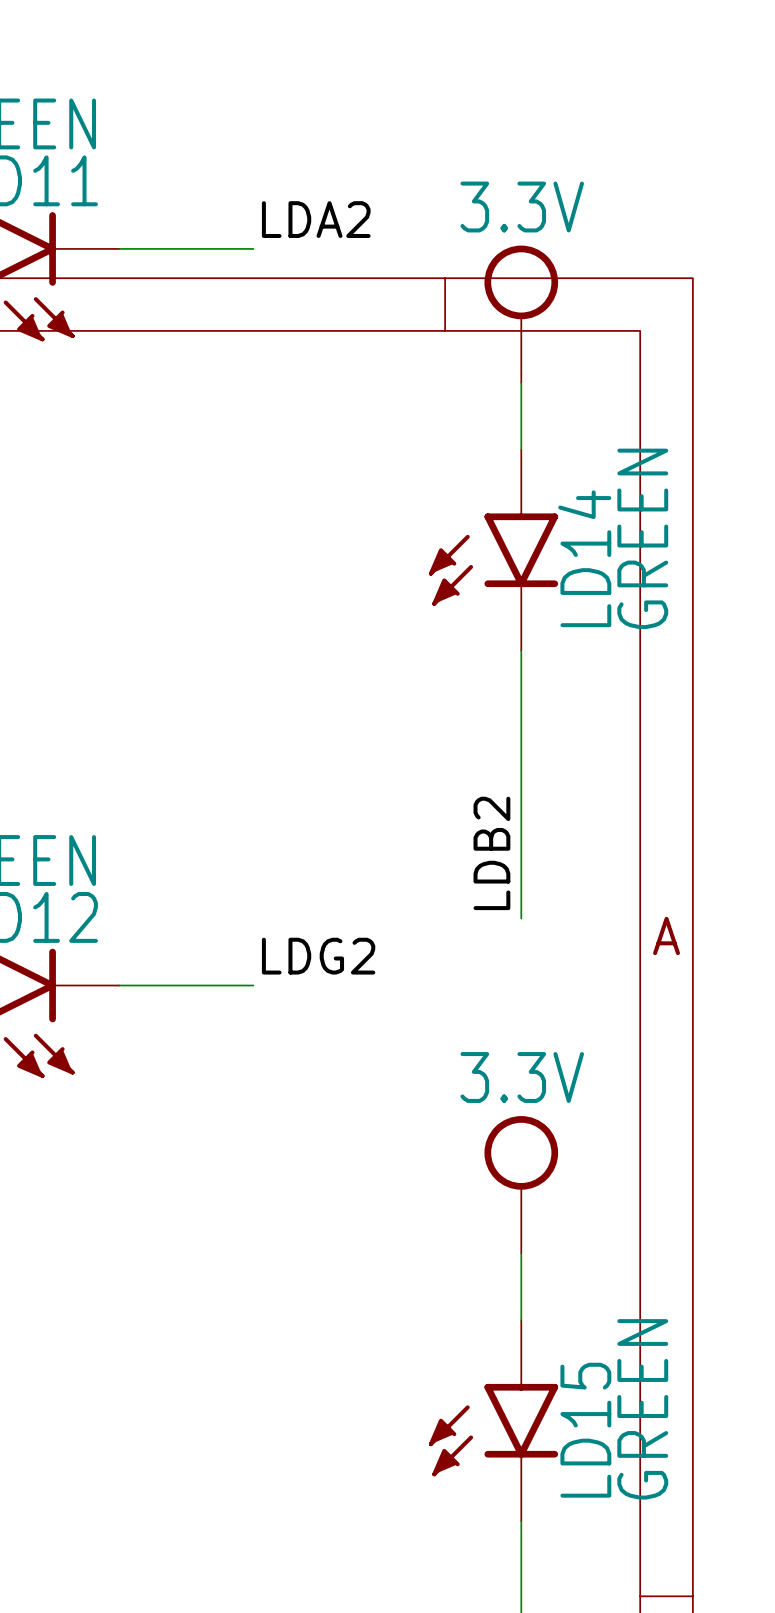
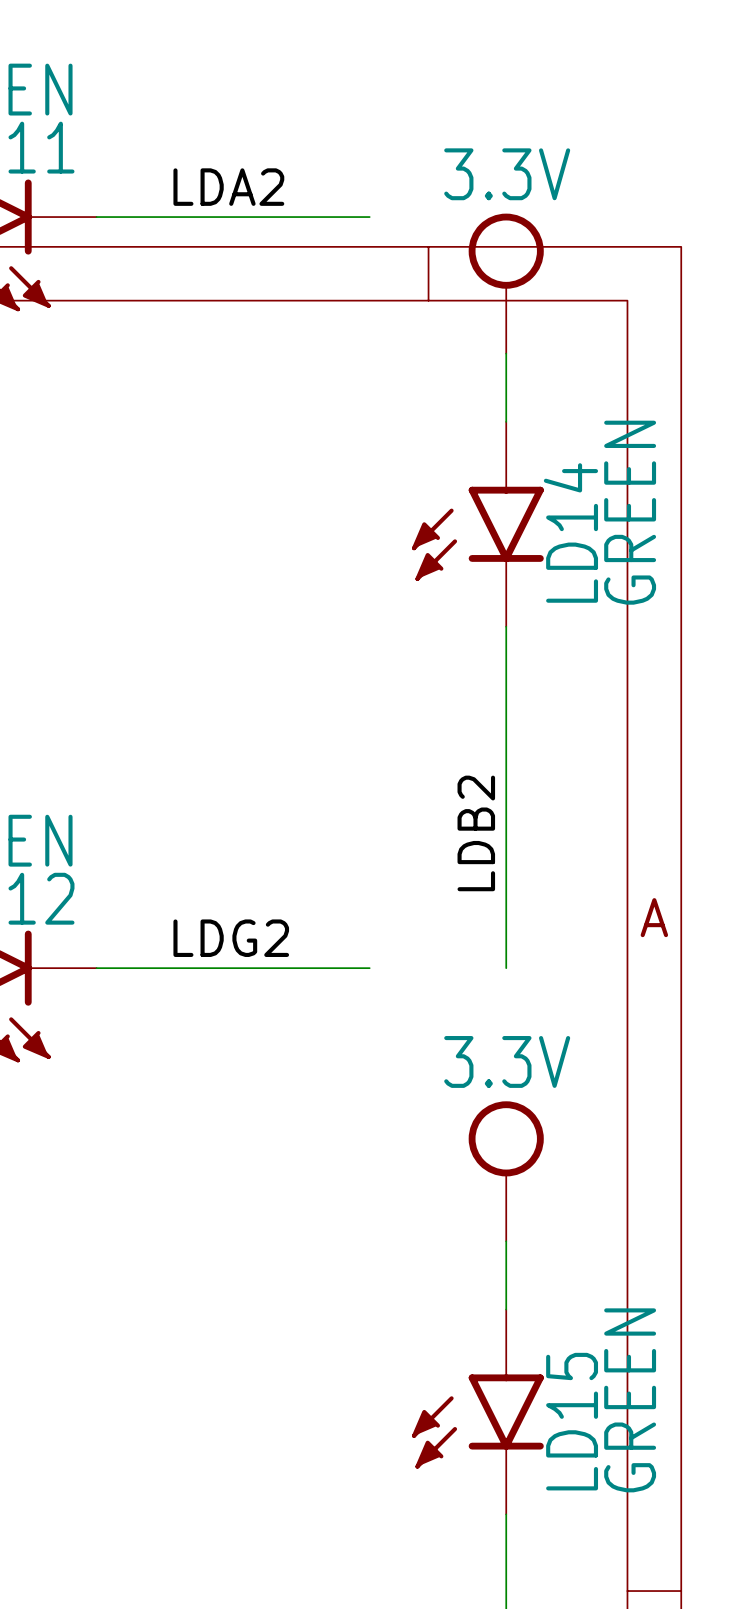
label position: LDA2 (316, 219) -> LDA2 (228, 187)
wire: none -> (233, 217) (369, 217)
wire: none -> (506, 899) (506, 968)
label position: LDG2 (318, 956) -> LDG2 (231, 938)
wire: none -> (233, 968) (369, 968)

